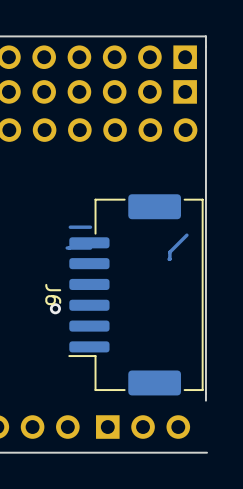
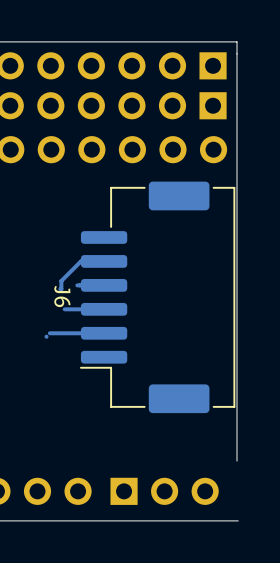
track: (186, 235) (169, 252) (169, 259) -> (80, 261) (61, 280) (60, 289)
track: none -> (104, 309) (64, 309)
track: none -> (104, 333) (49, 333)
J6 position: (135, 294) -> (157, 297)
via: (55, 308) -> none

